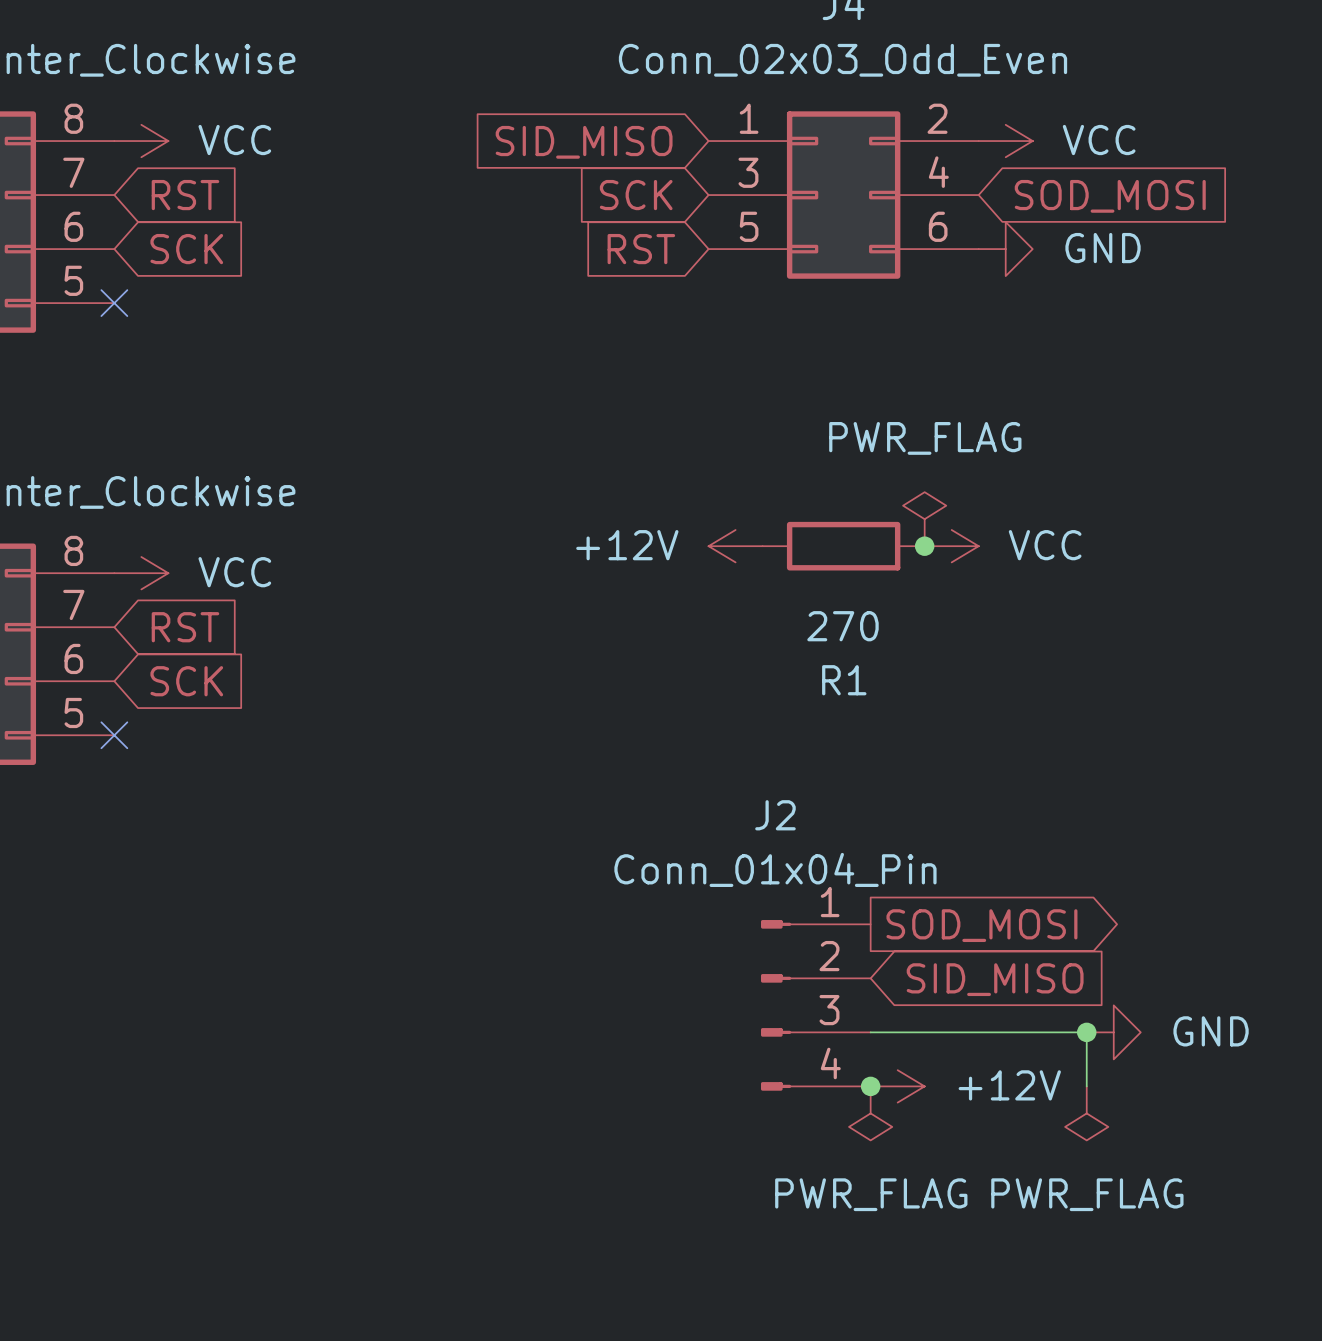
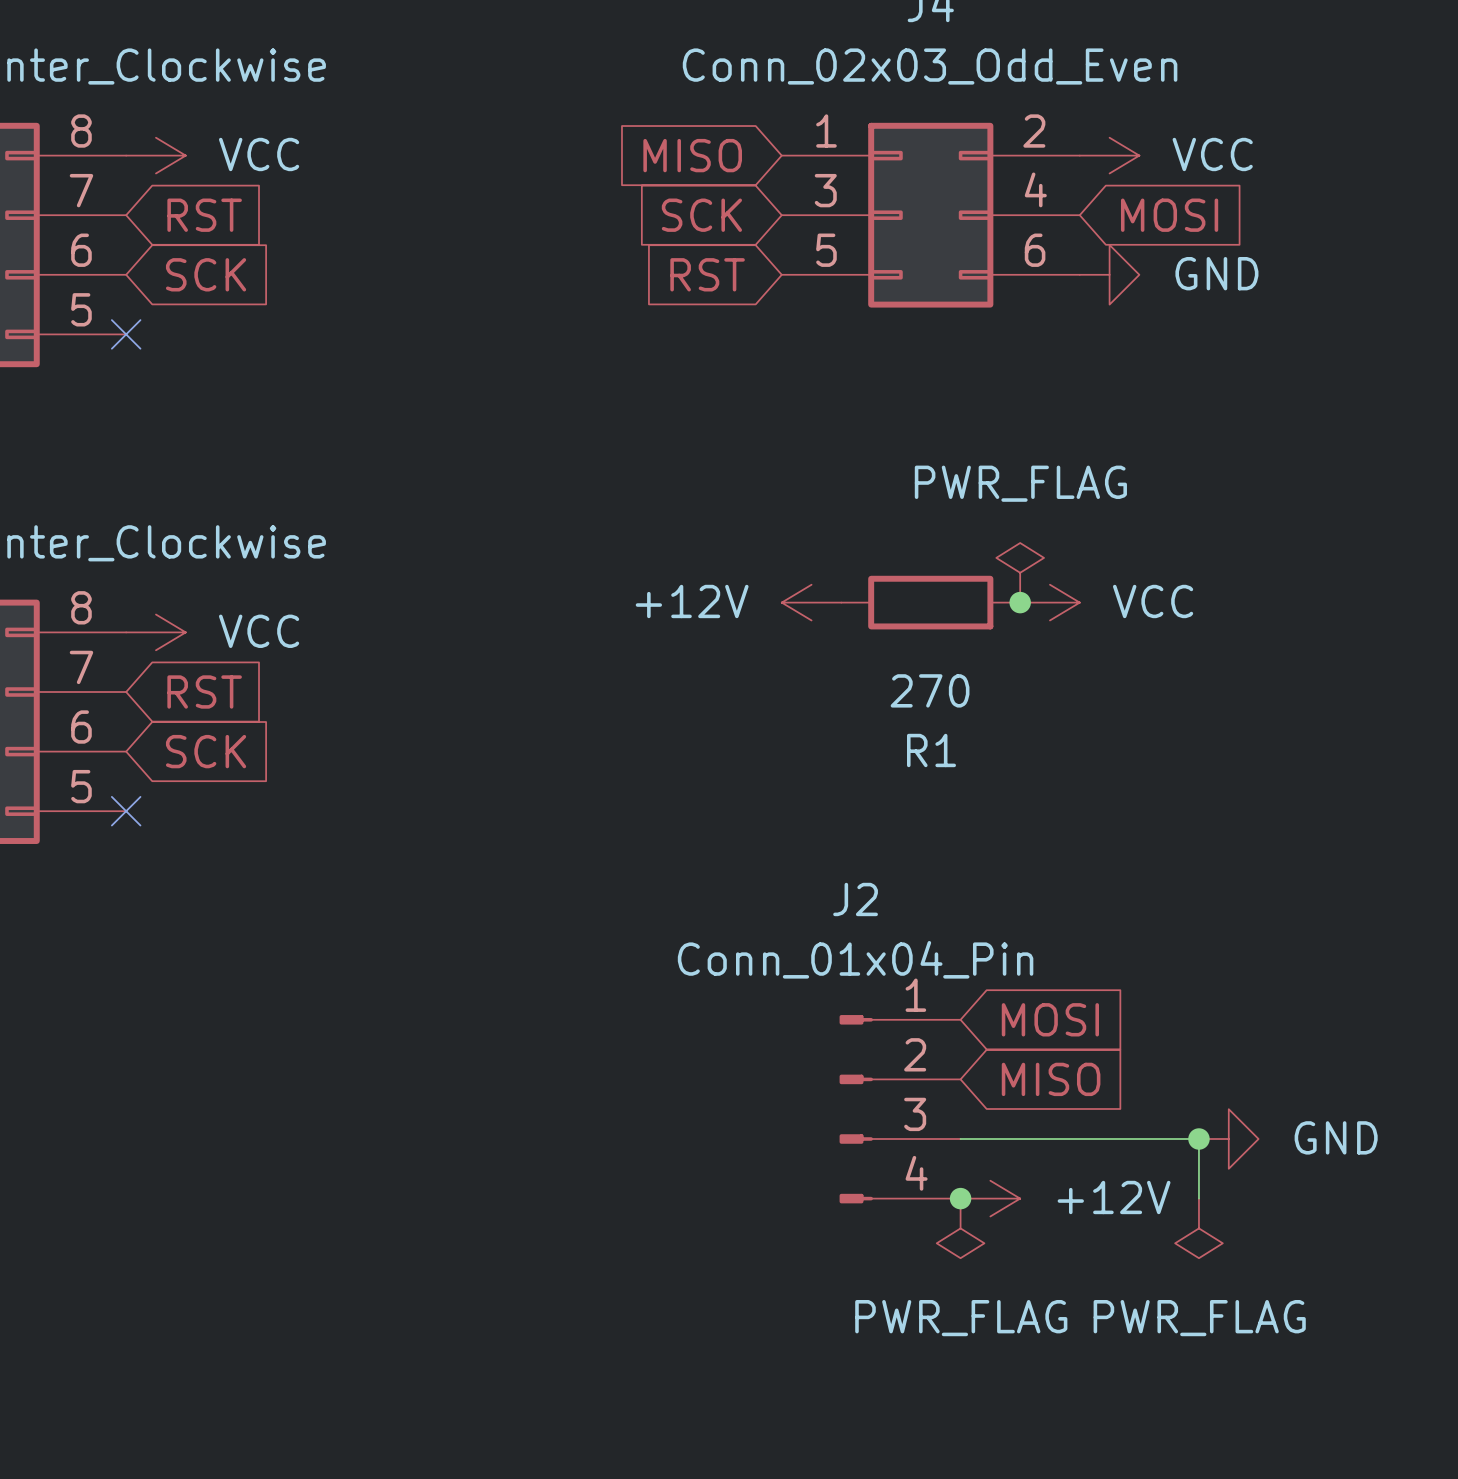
global label: SID_MISO (584, 142) -> MISO (692, 155)
global label: SOD_MOSI (1110, 196) -> MOSI (1169, 215)
global label shape: output (981, 925) -> input (1050, 1019)
global label: SOD_MOSI (981, 925) -> MOSI (1050, 1019)
global label: SID_MISO (995, 979) -> MISO (1051, 1079)

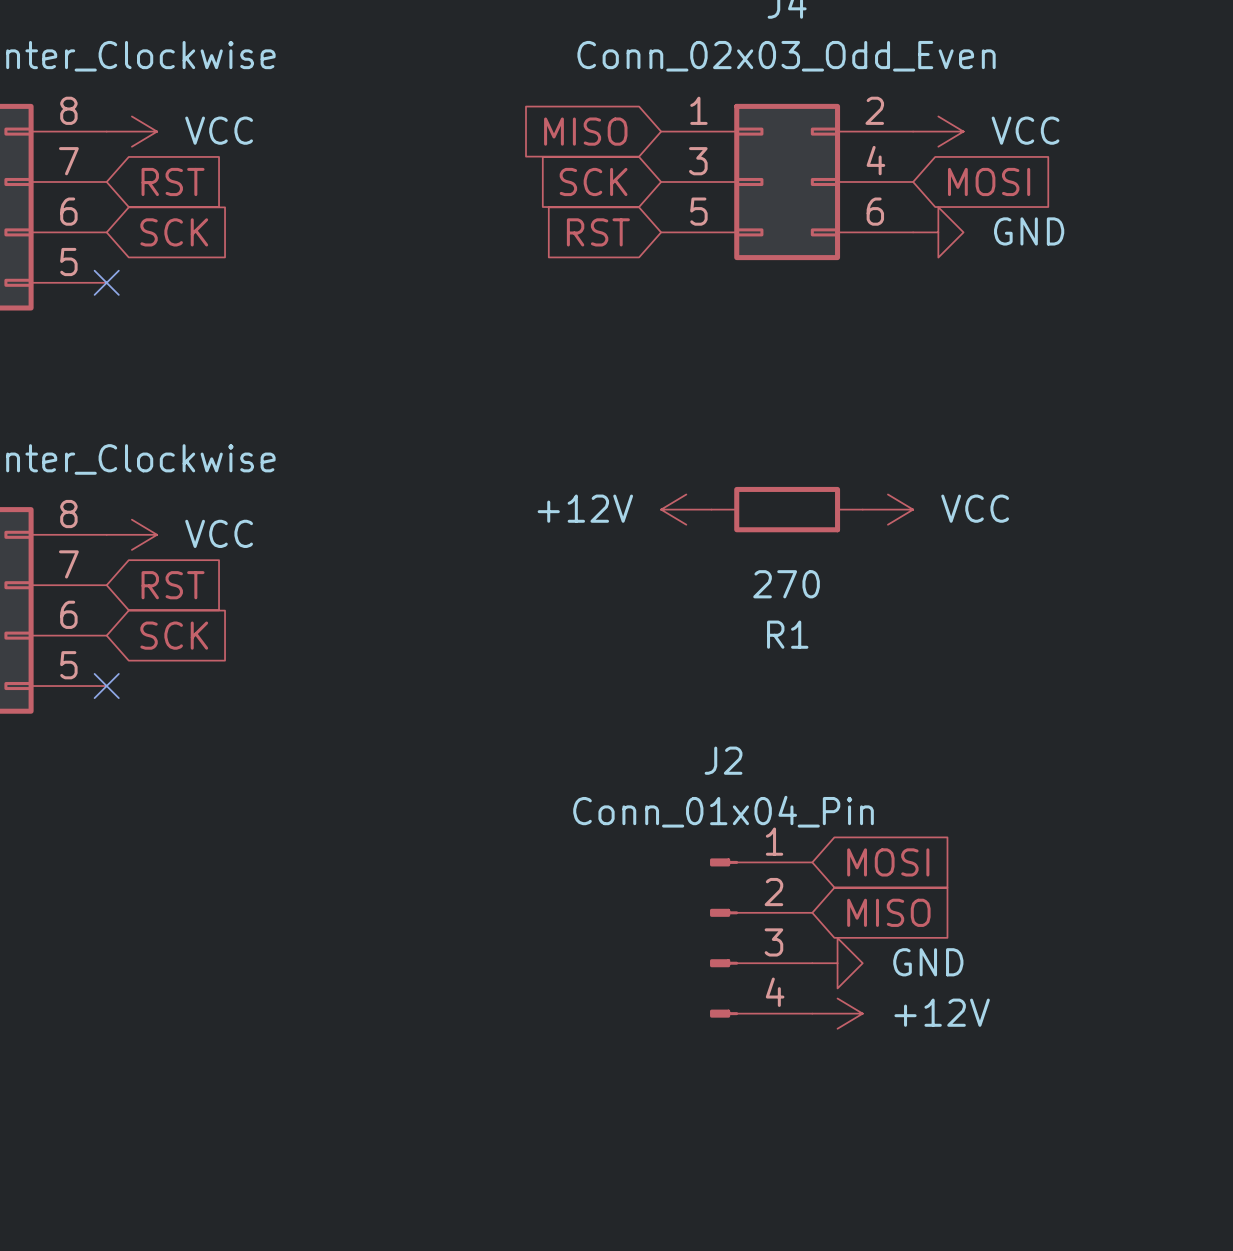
power symbol: PWR_FLAG (1020, 572) -> none
junction: (1020, 602) -> none
wire: (960, 1139) (1198, 1139) (1198, 1198) -> none
junction: (1198, 1139) -> none
power symbol position: GND (1228, 1139) -> GND (837, 963)
junction: (960, 1198) -> none
power symbol: PWR_FLAG (960, 1228) -> none
power symbol: PWR_FLAG (1198, 1228) -> none

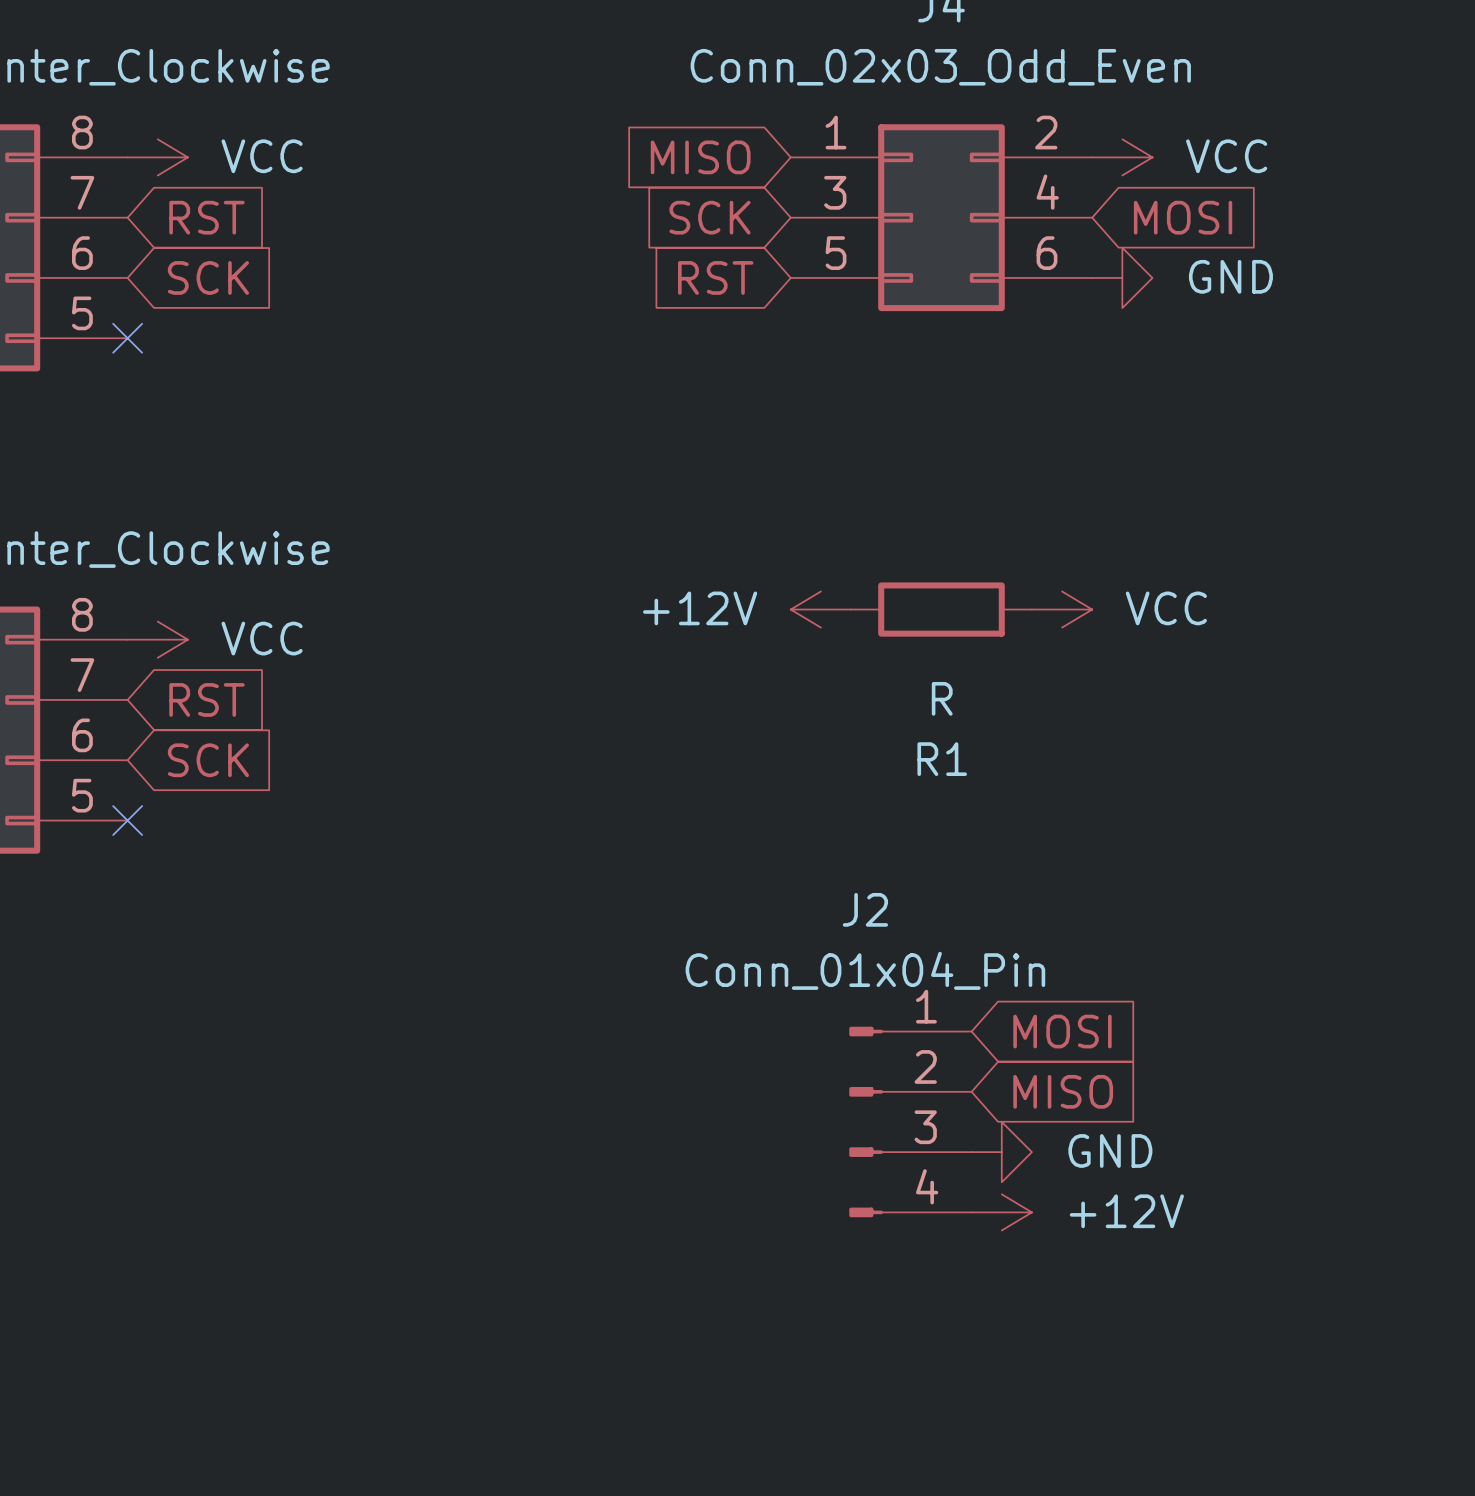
R1 value: 270 (786, 584) -> R (942, 698)

